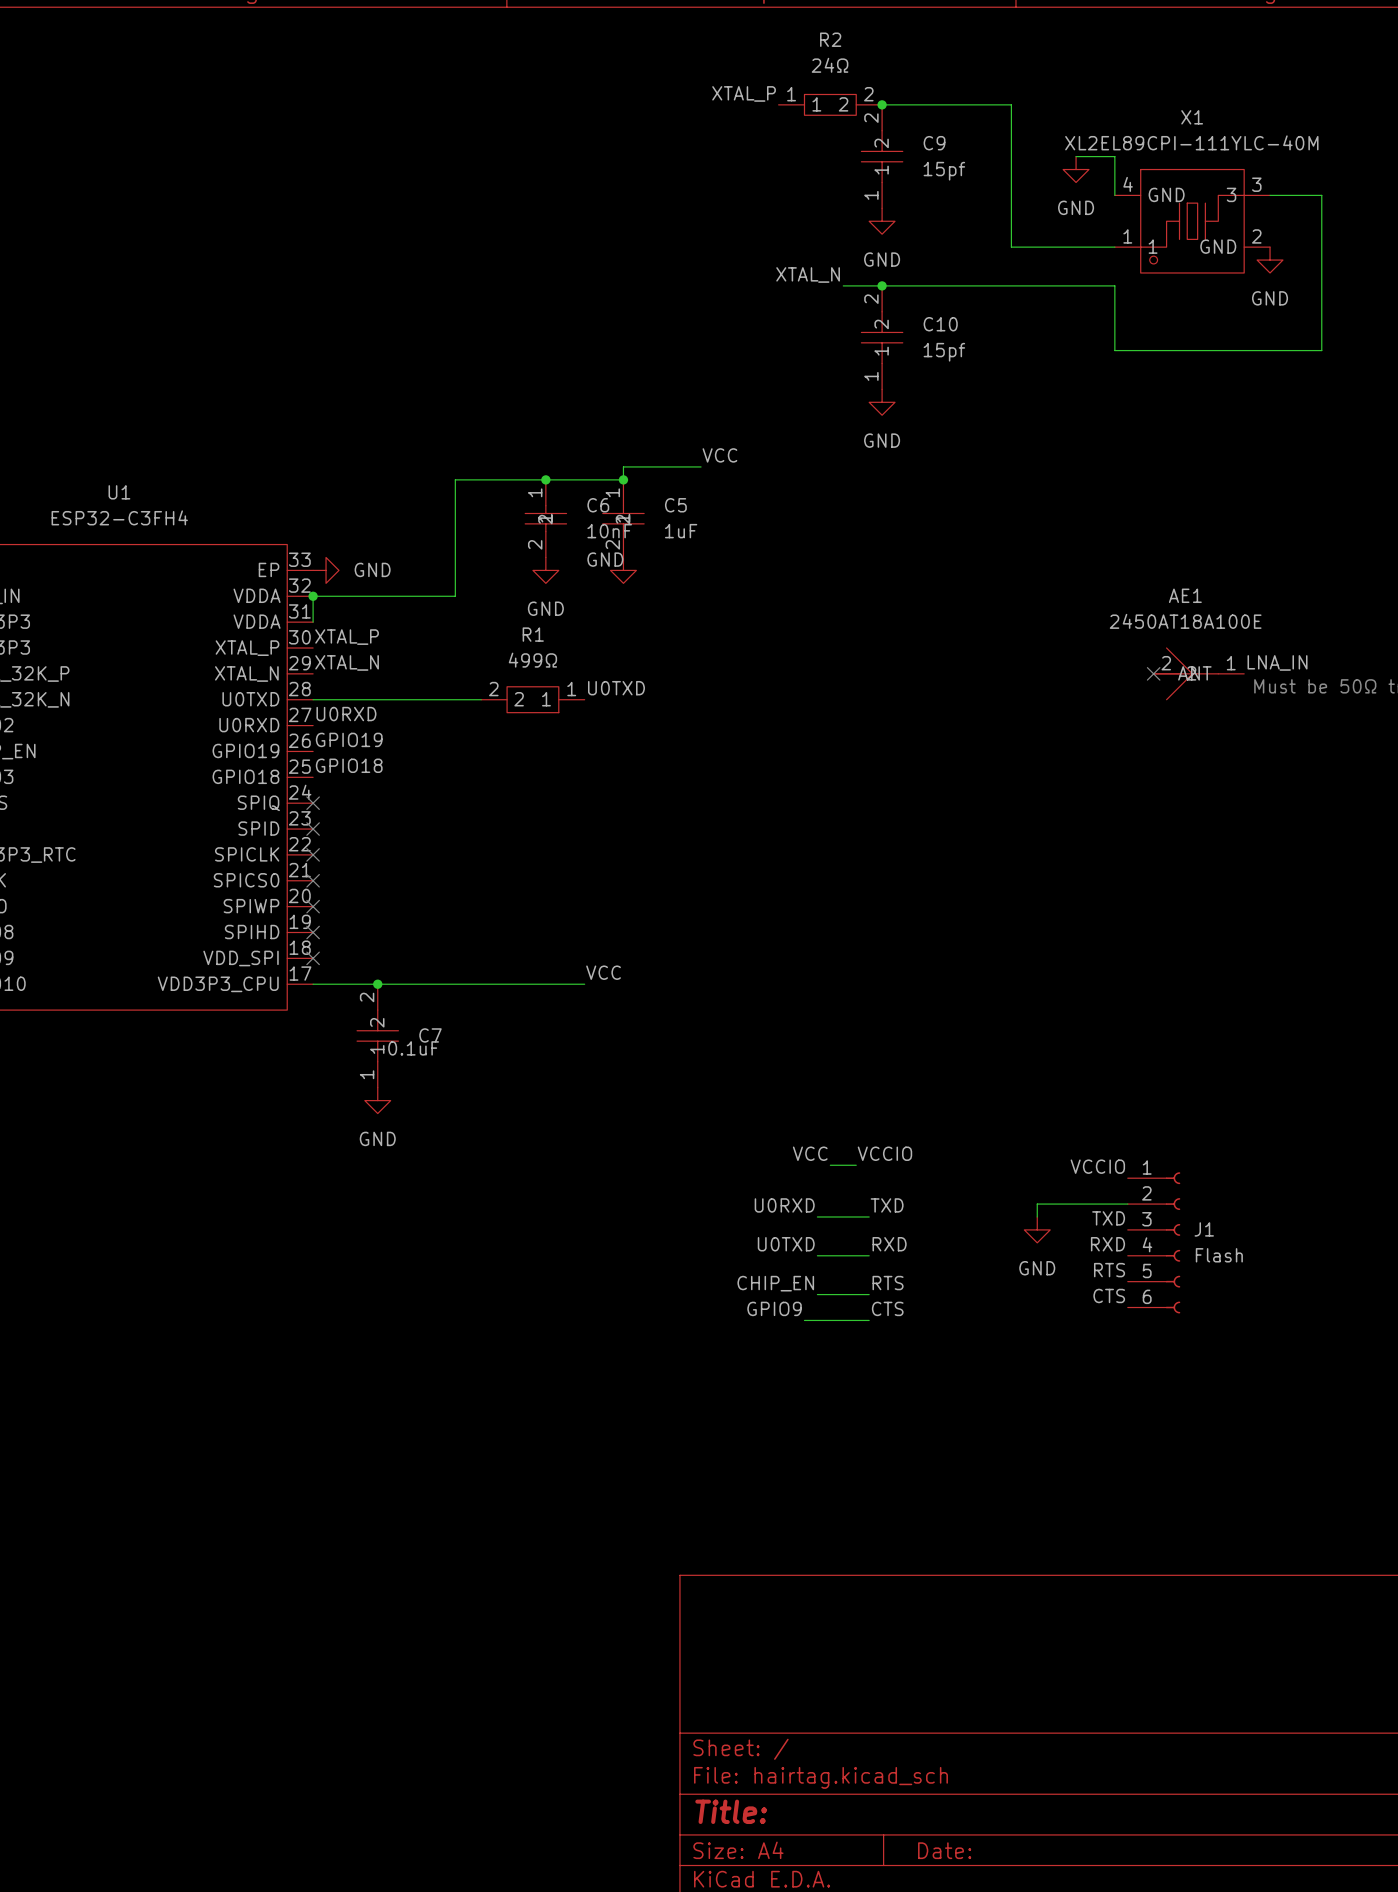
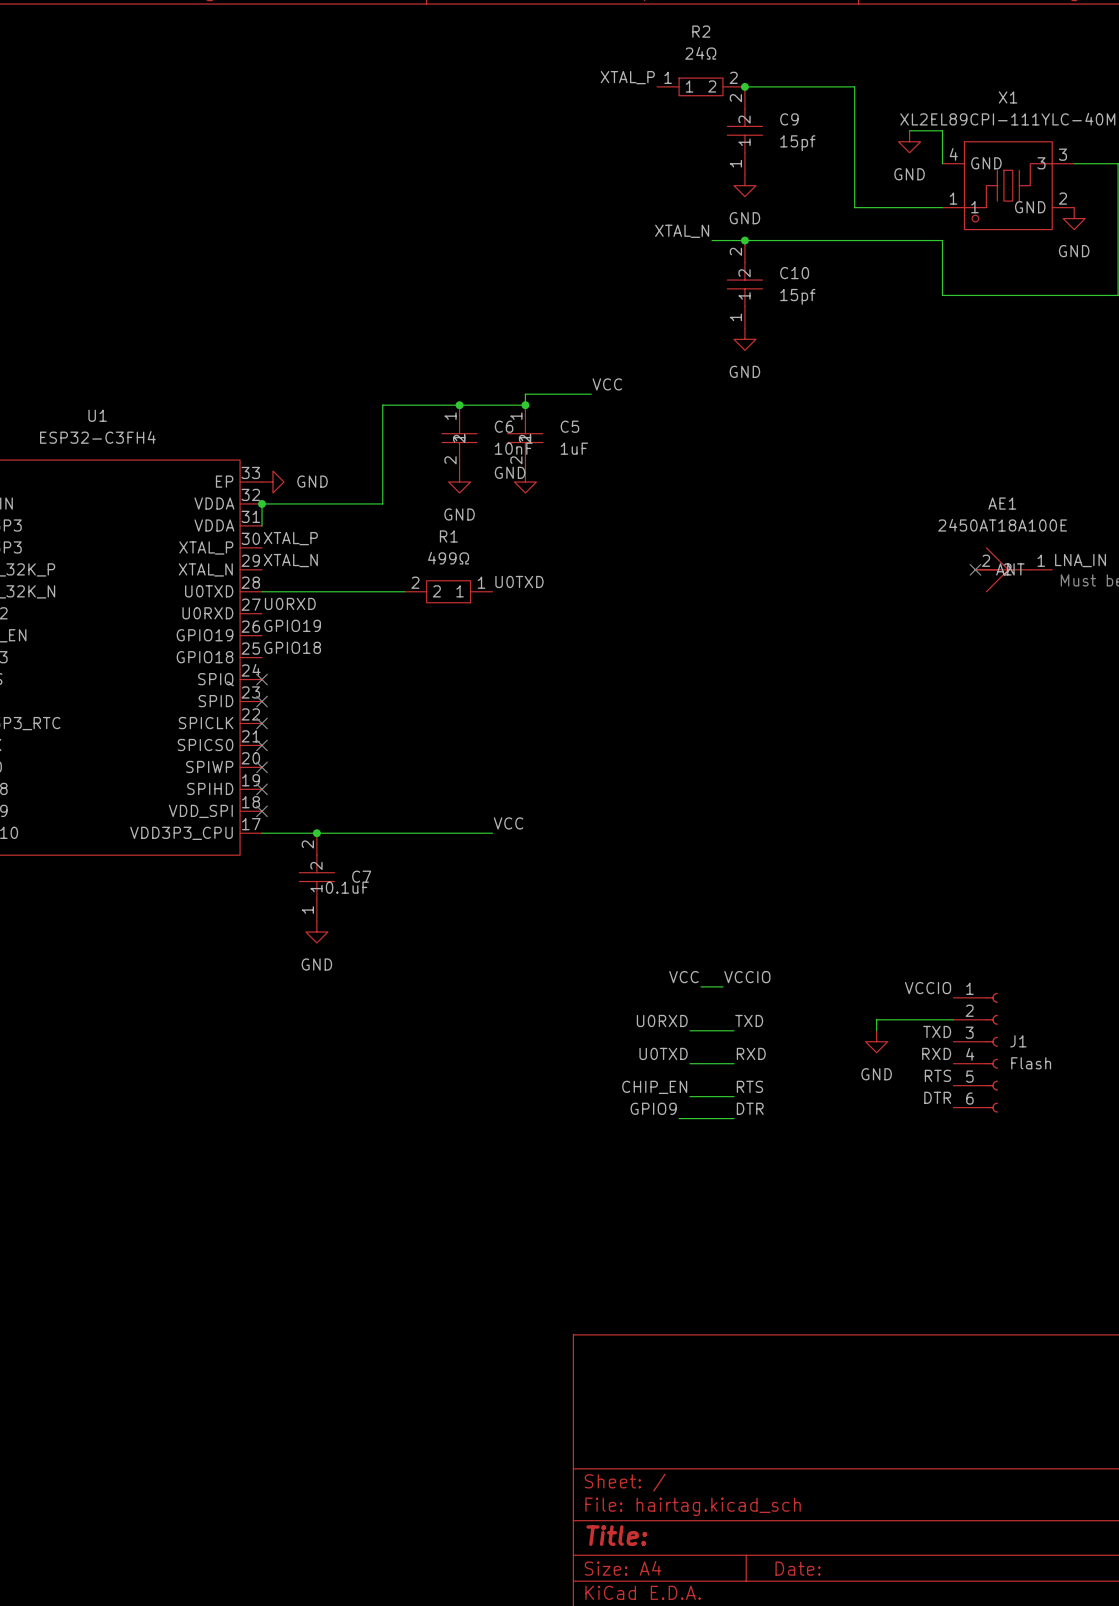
label: CTS (1109, 1295) -> DTR (937, 1097)
label: CTS (887, 1308) -> DTR (750, 1108)

